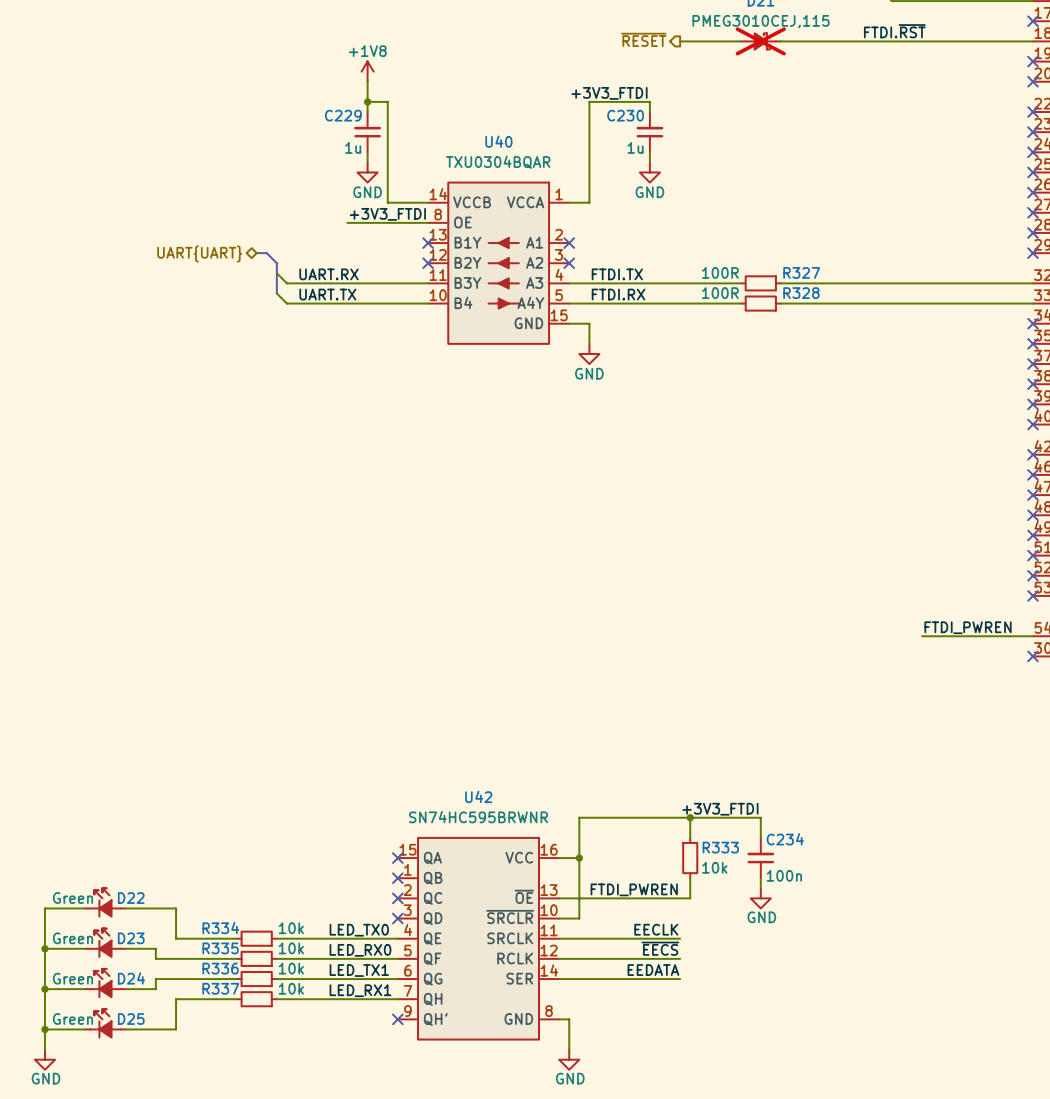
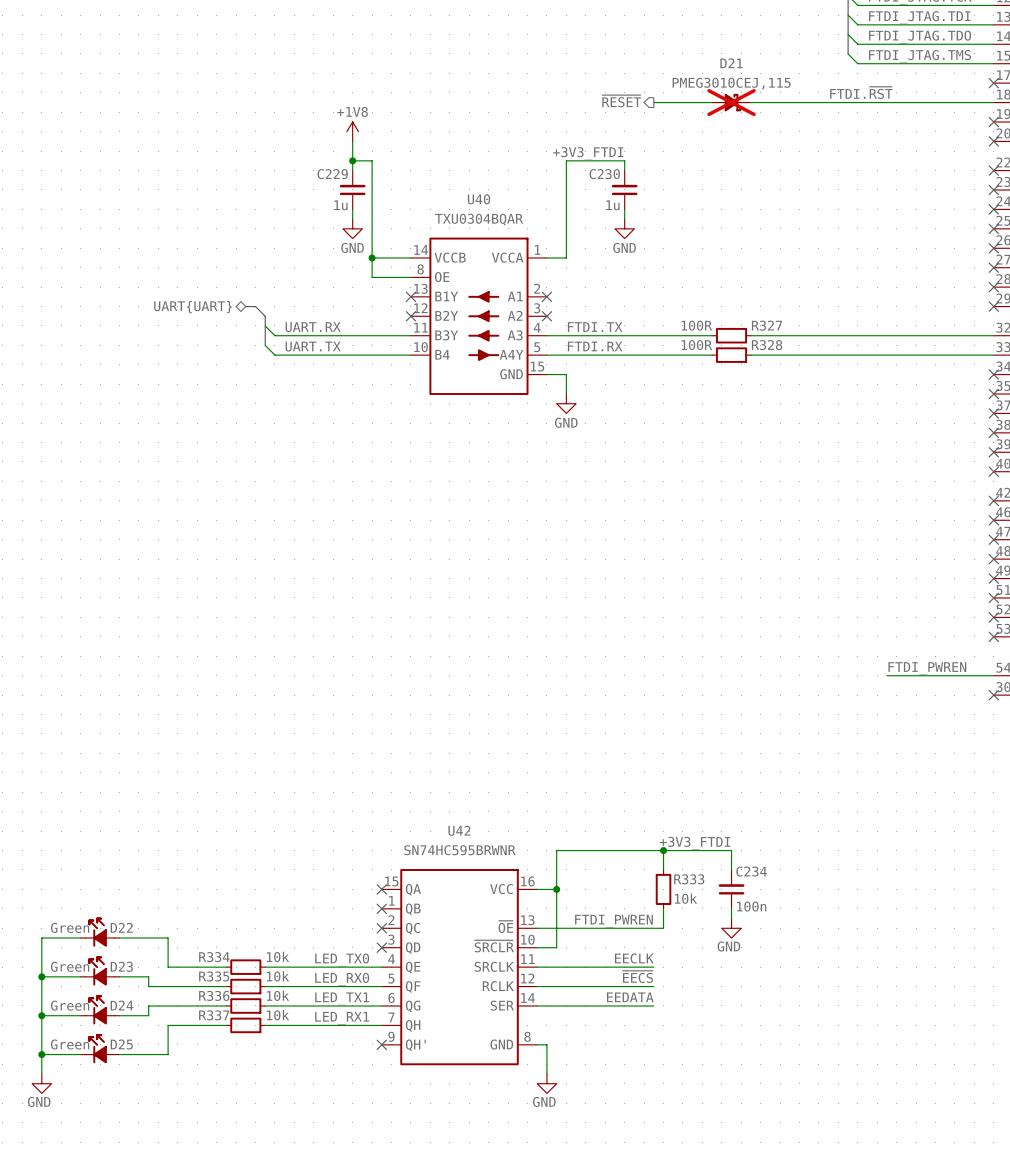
junction: none -> (372, 257)
label: +3V3_FTDI (387, 214) -> none
wire: (347, 222) (387, 222) -> (372, 257) (372, 277)

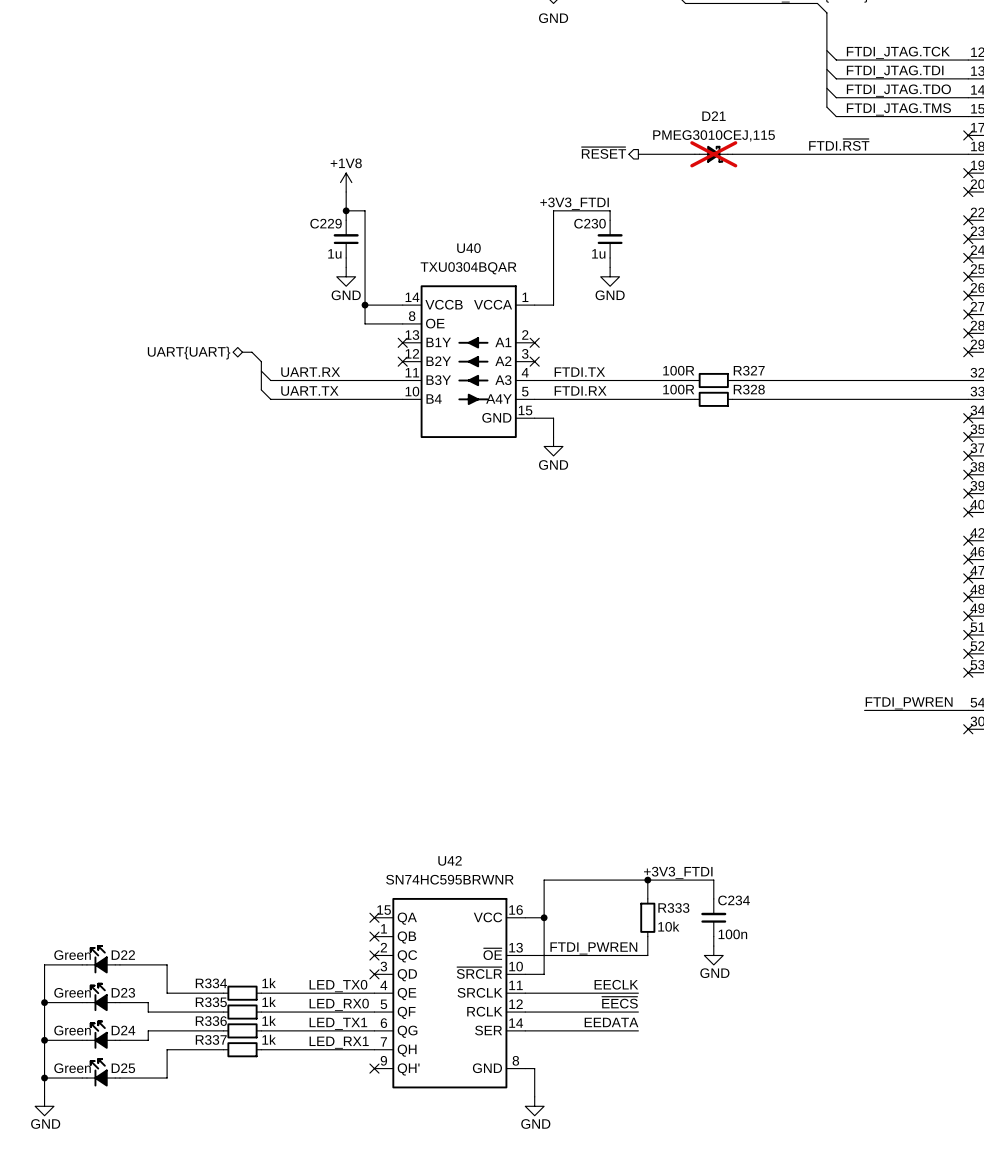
R334 text: 10k (277, 956) -> 1k (269, 983)
R335 text: 10k (277, 976) -> 1k (269, 1002)
R336 text: 10k (277, 995) -> 1k (269, 1020)
R337 text: 10k (277, 1015) -> 1k (269, 1039)

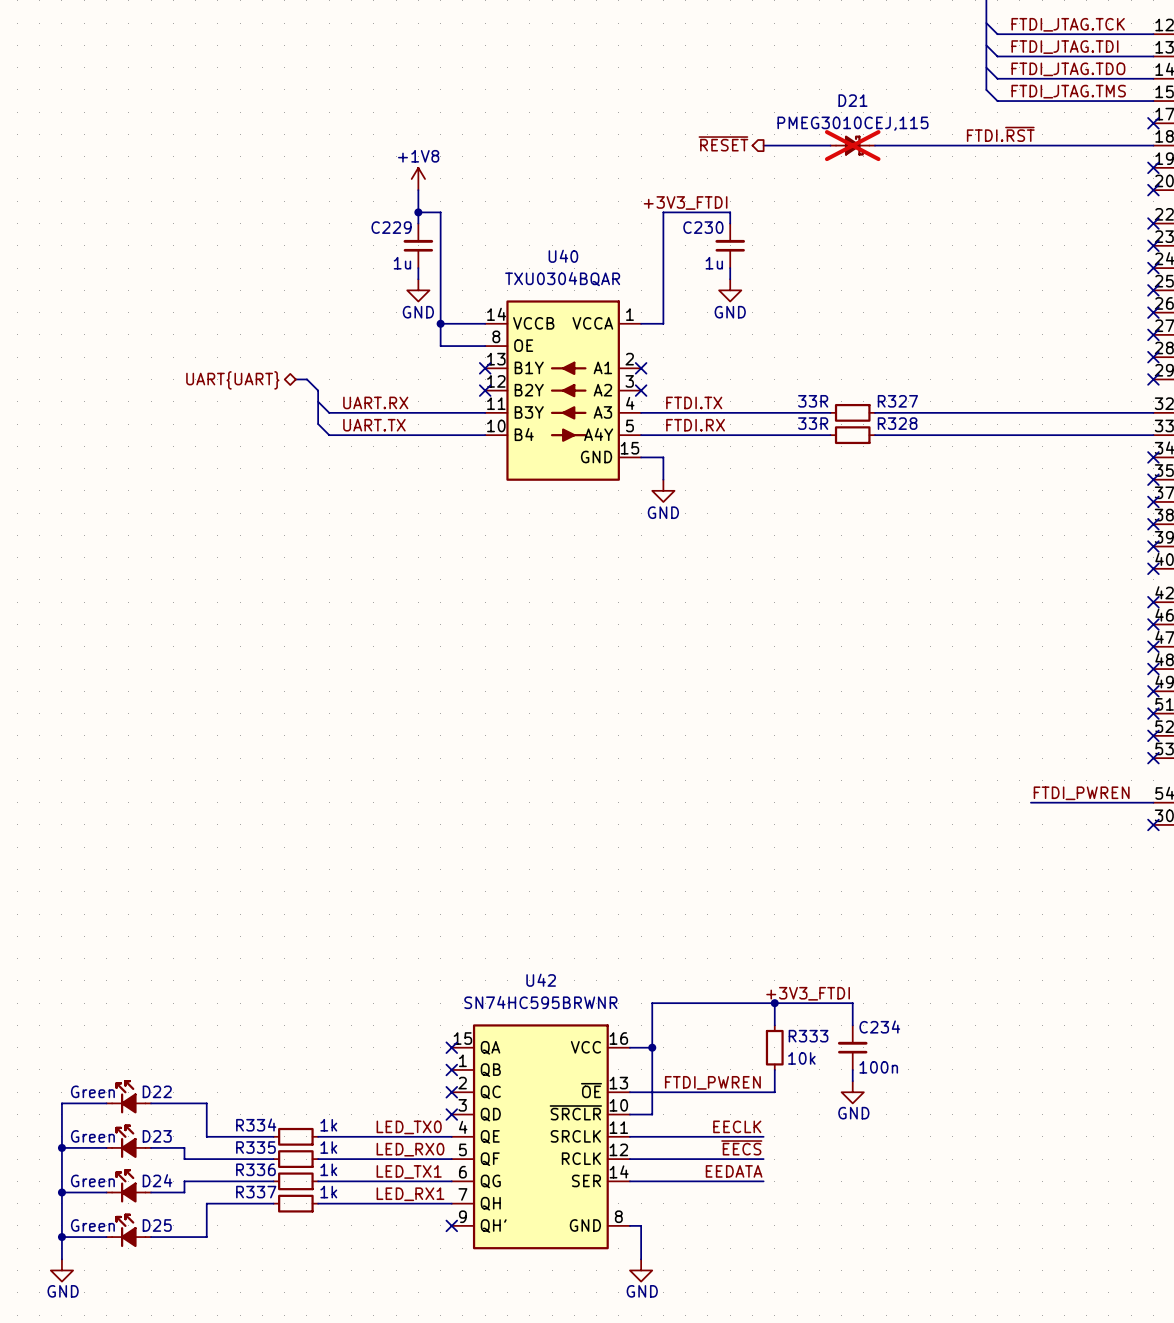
R327 text: 100R (678, 370) -> 33R (813, 401)
R328 text: 100R (678, 389) -> 33R (813, 423)

